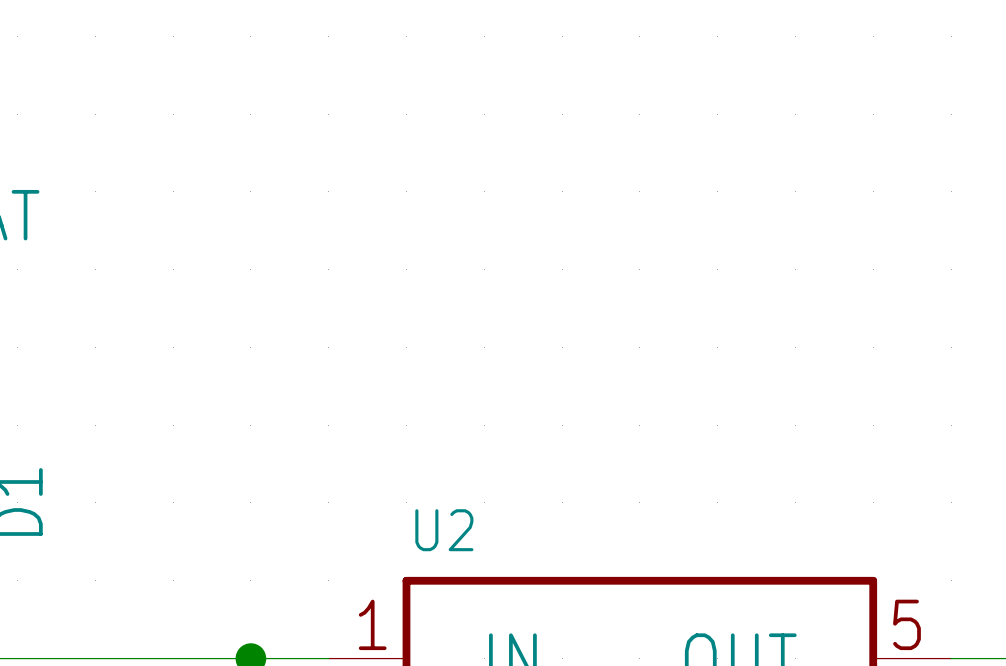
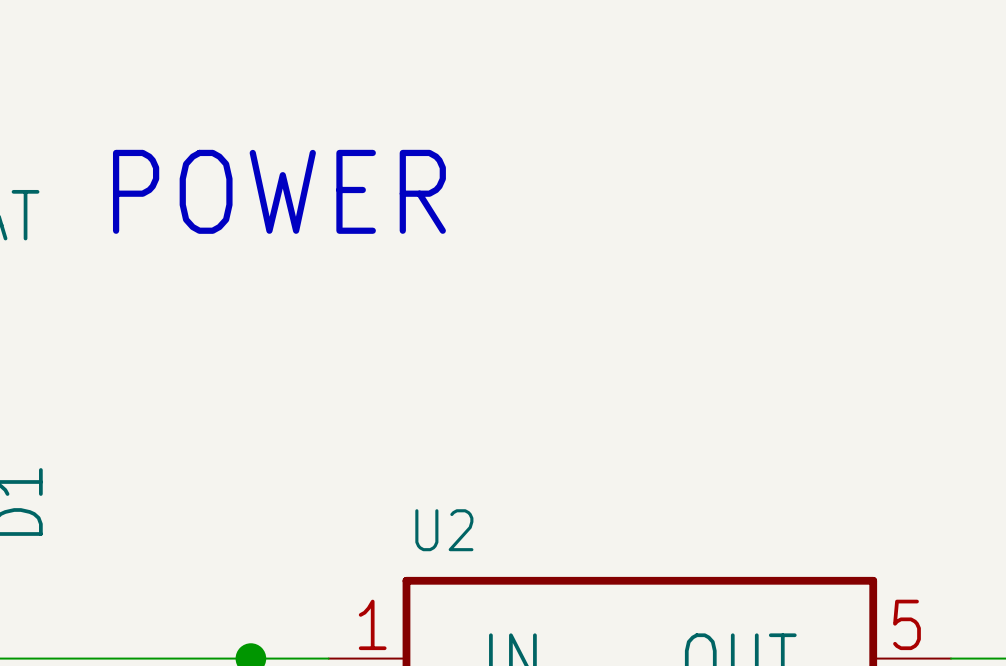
text: none -> POWER (279, 191)

